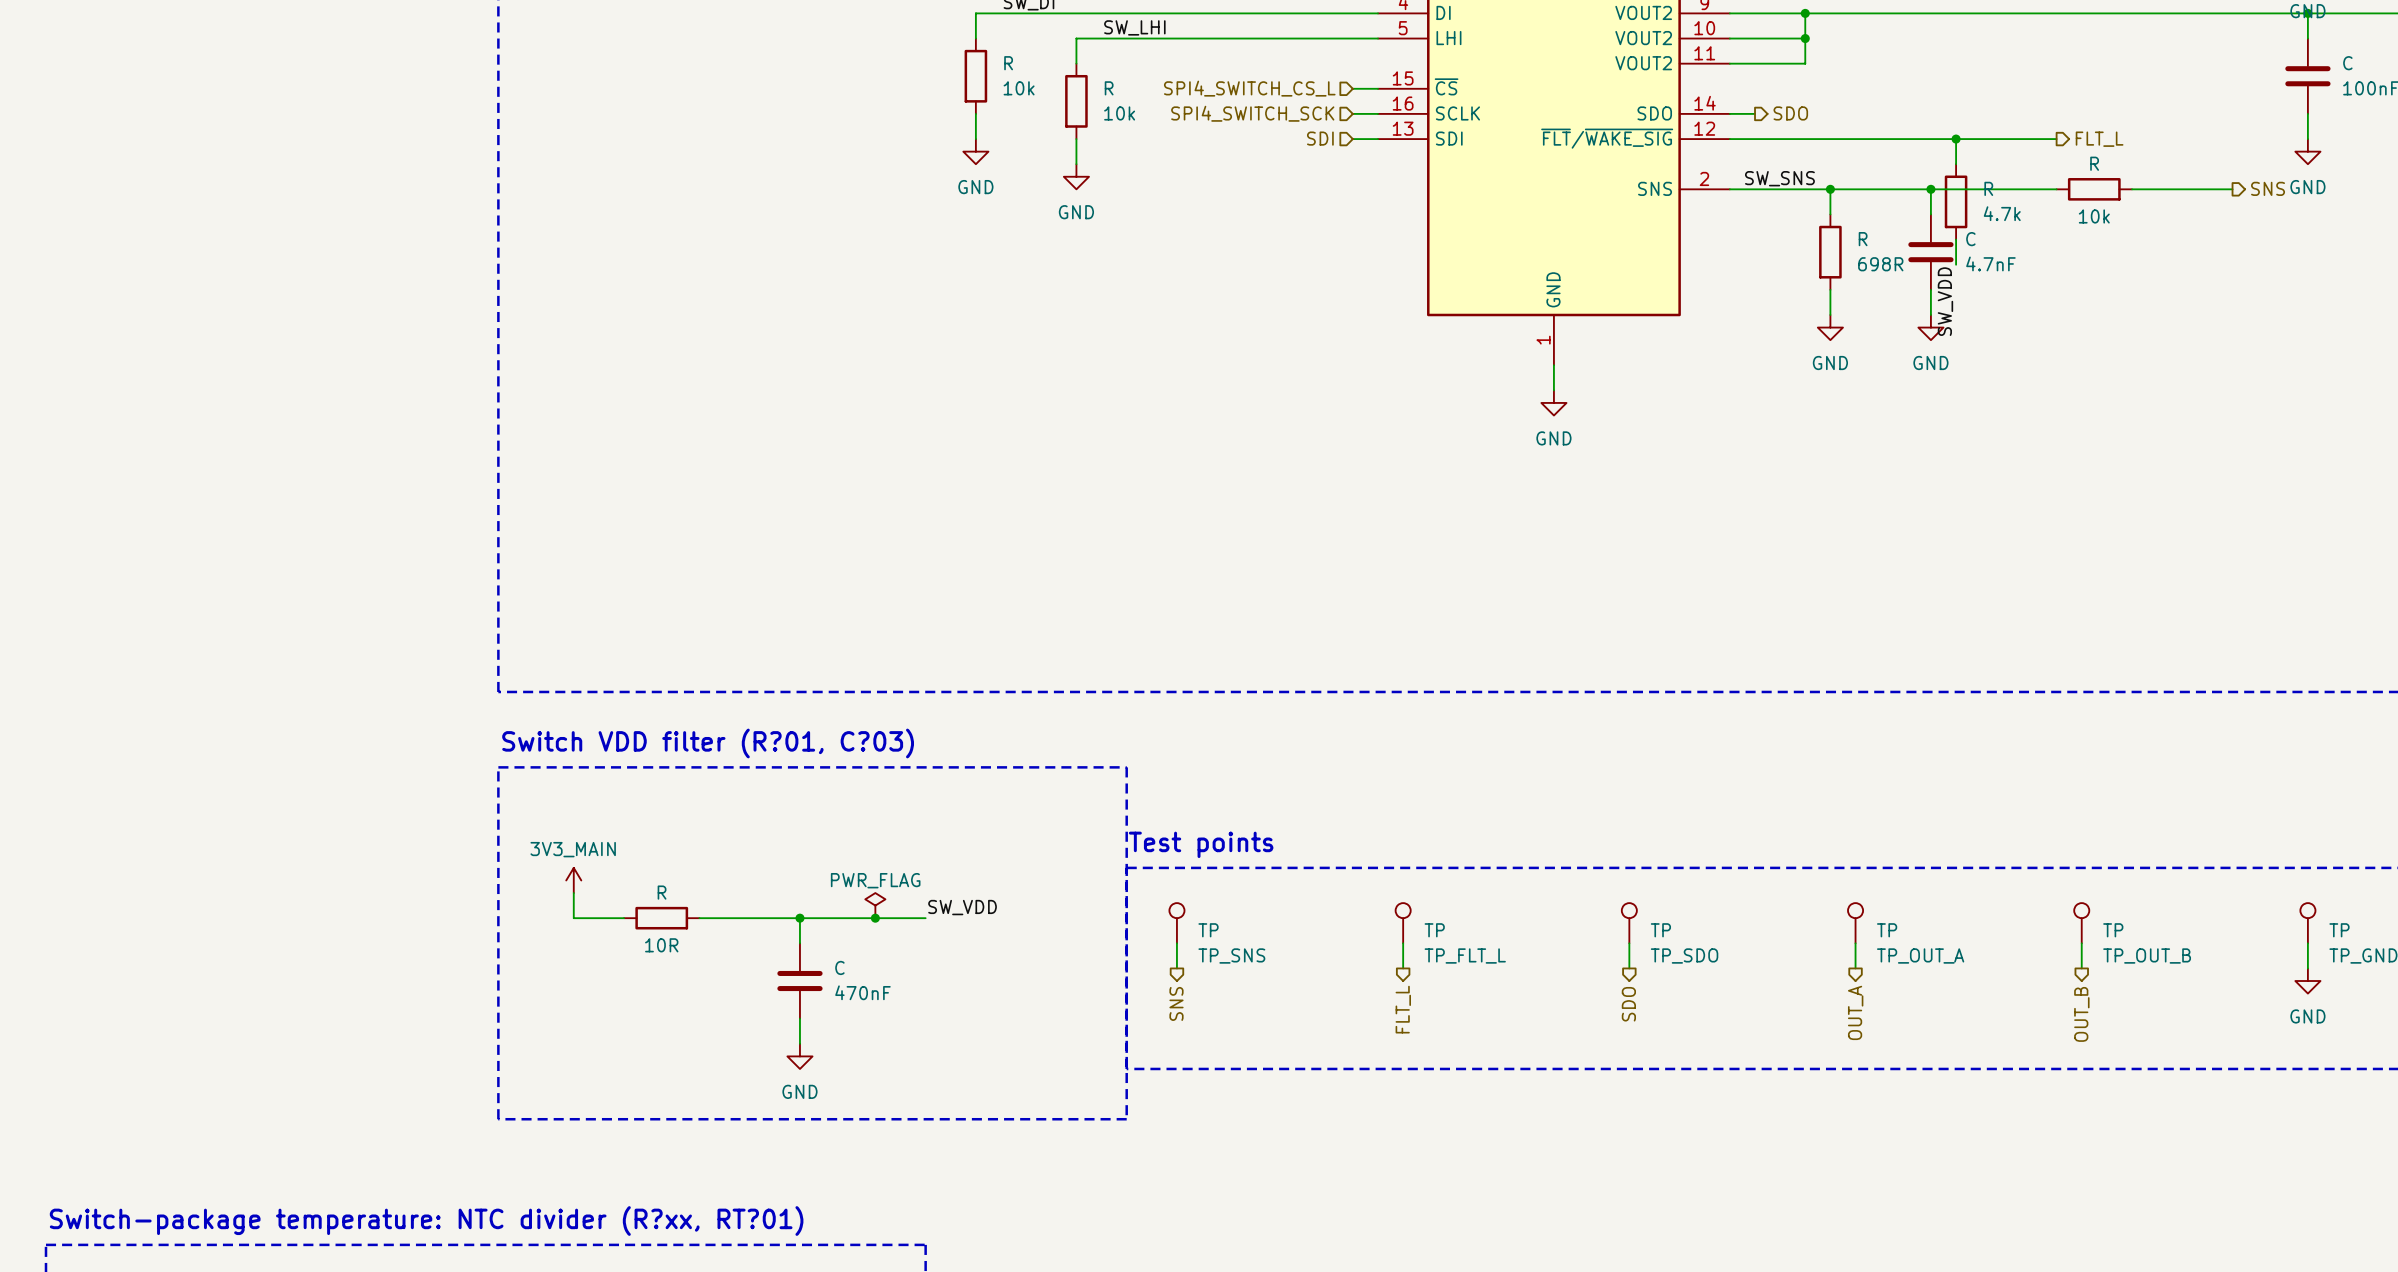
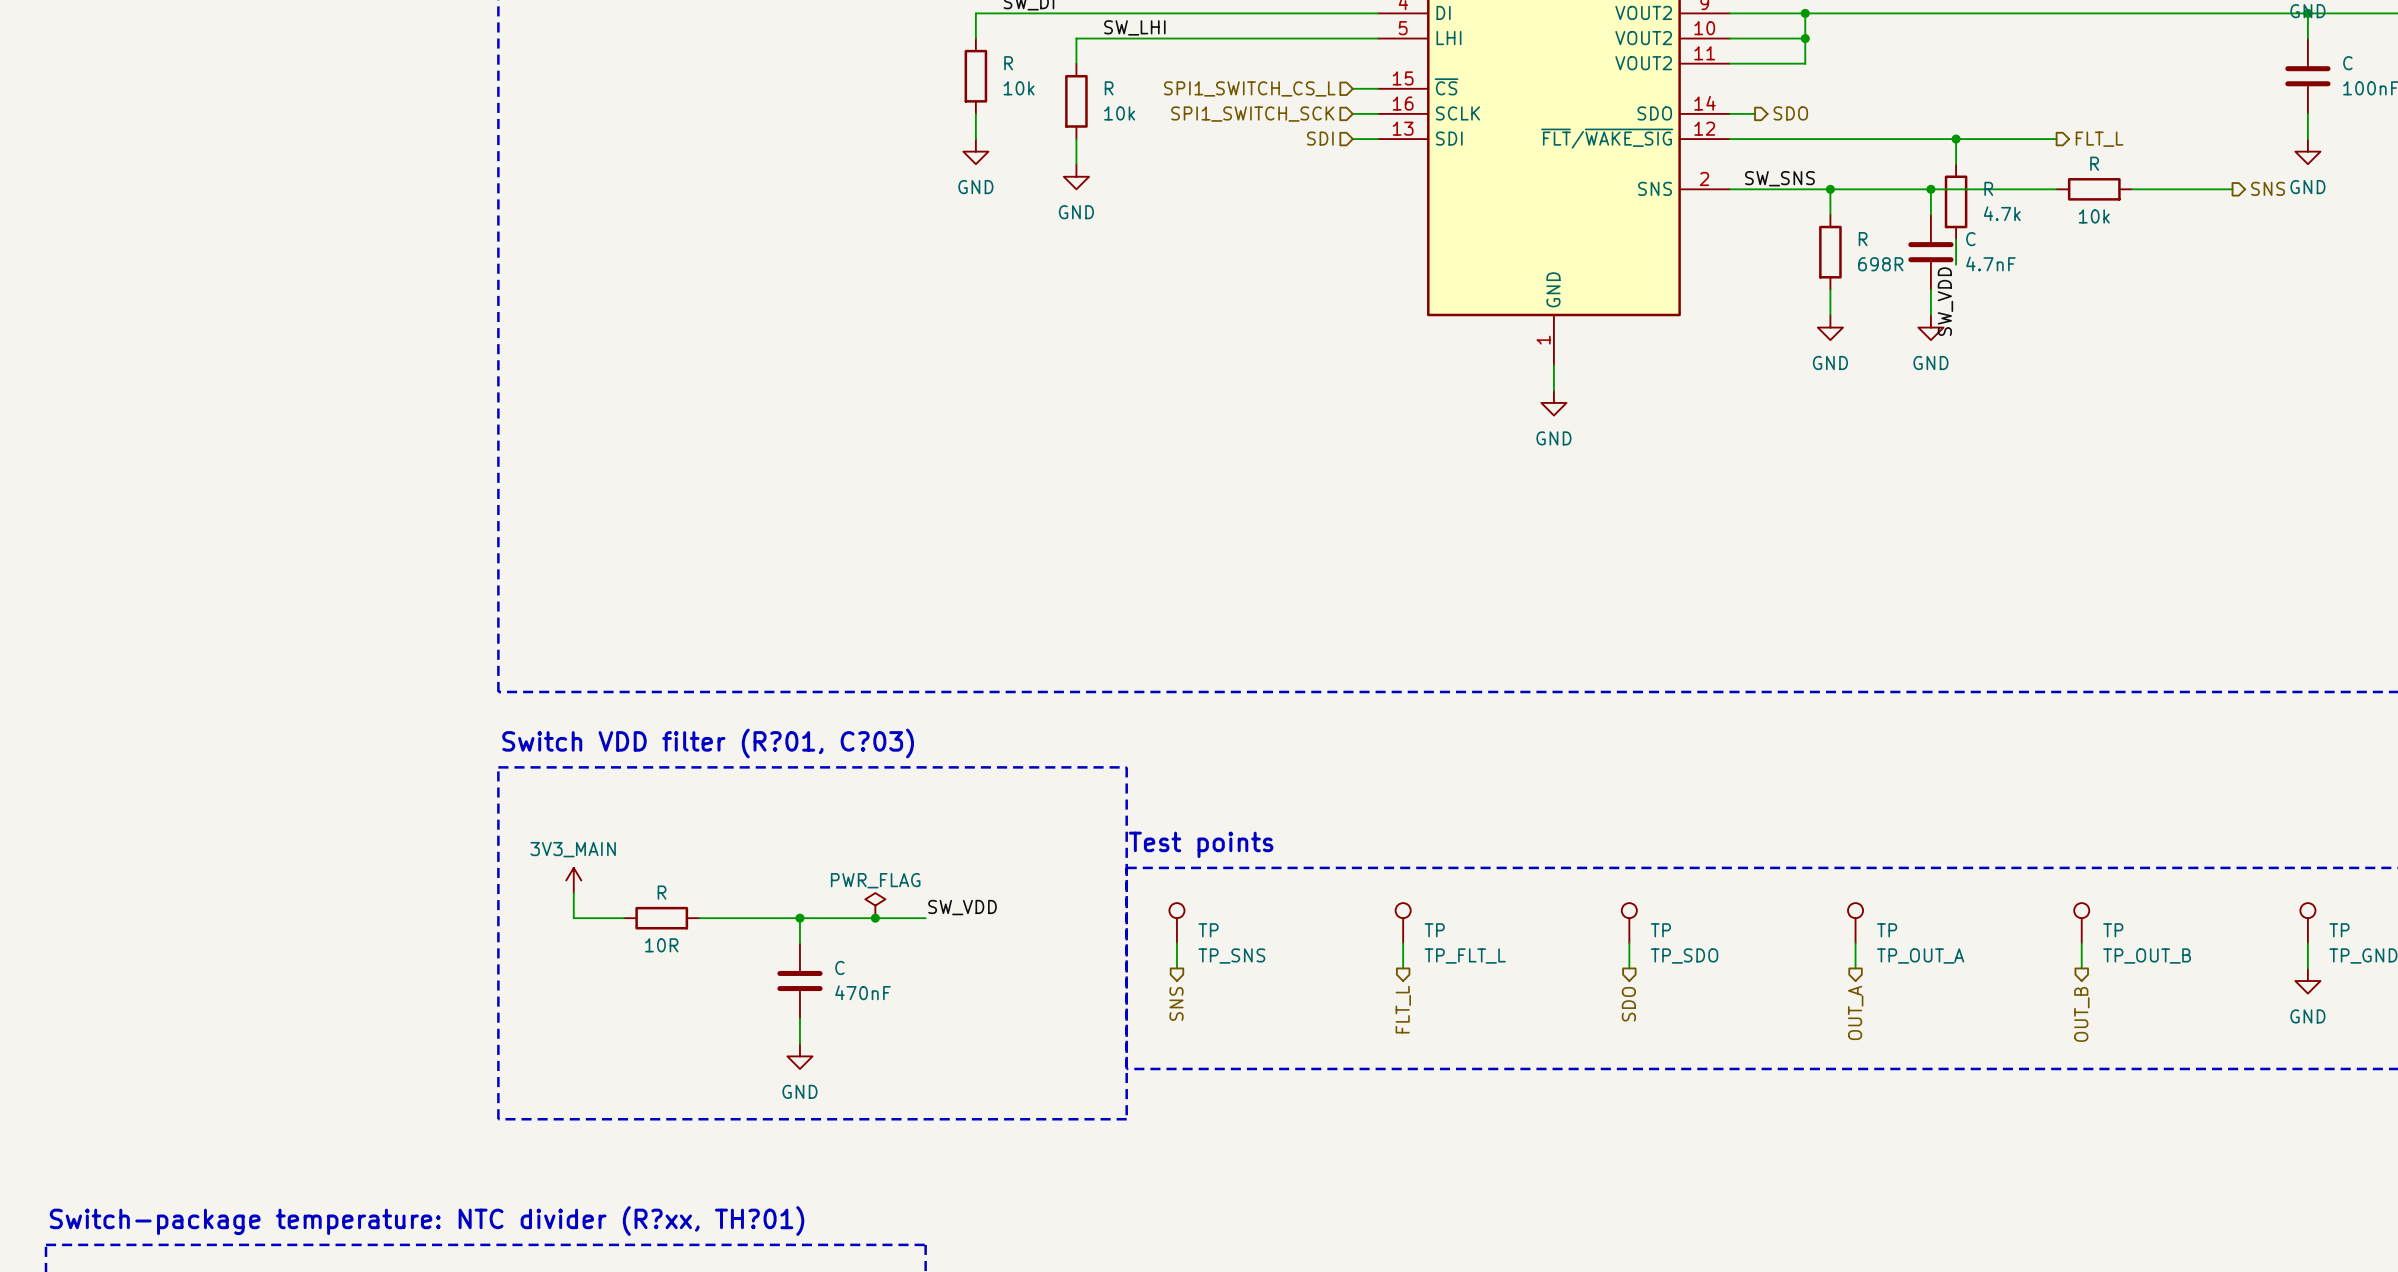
hierarchical label: SPI4_SWITCH_CS_L (1249, 88) -> SPI1_SWITCH_CS_L (1249, 88)
hierarchical label: SPI4_SWITCH_SCK (1252, 113) -> SPI1_SWITCH_SCK (1252, 114)
text: Switch-package temperature: NTC divider (R?xx, RT?01) (426, 1221) -> Switch-package temperature: NTC divider (R?xx, TH?01) (427, 1221)

